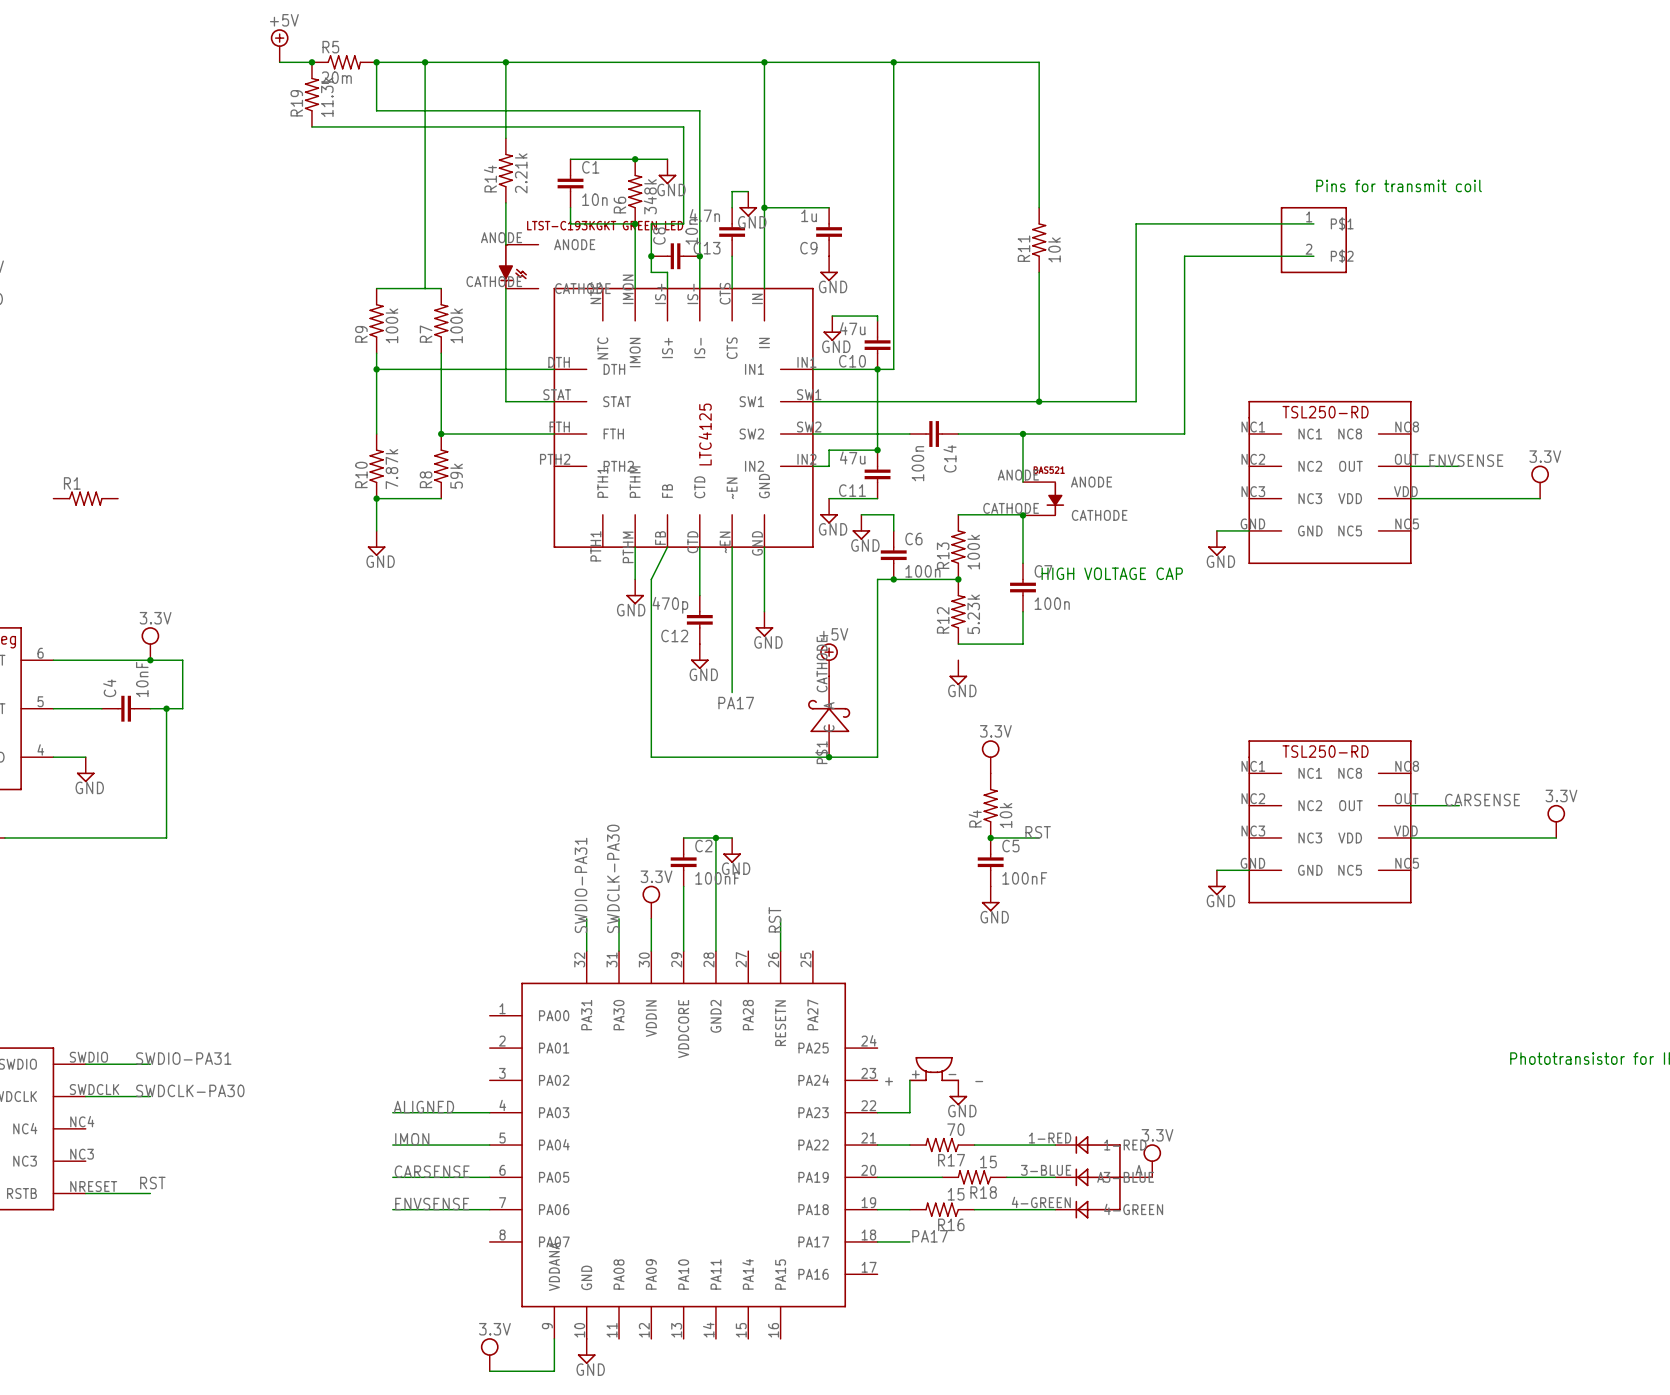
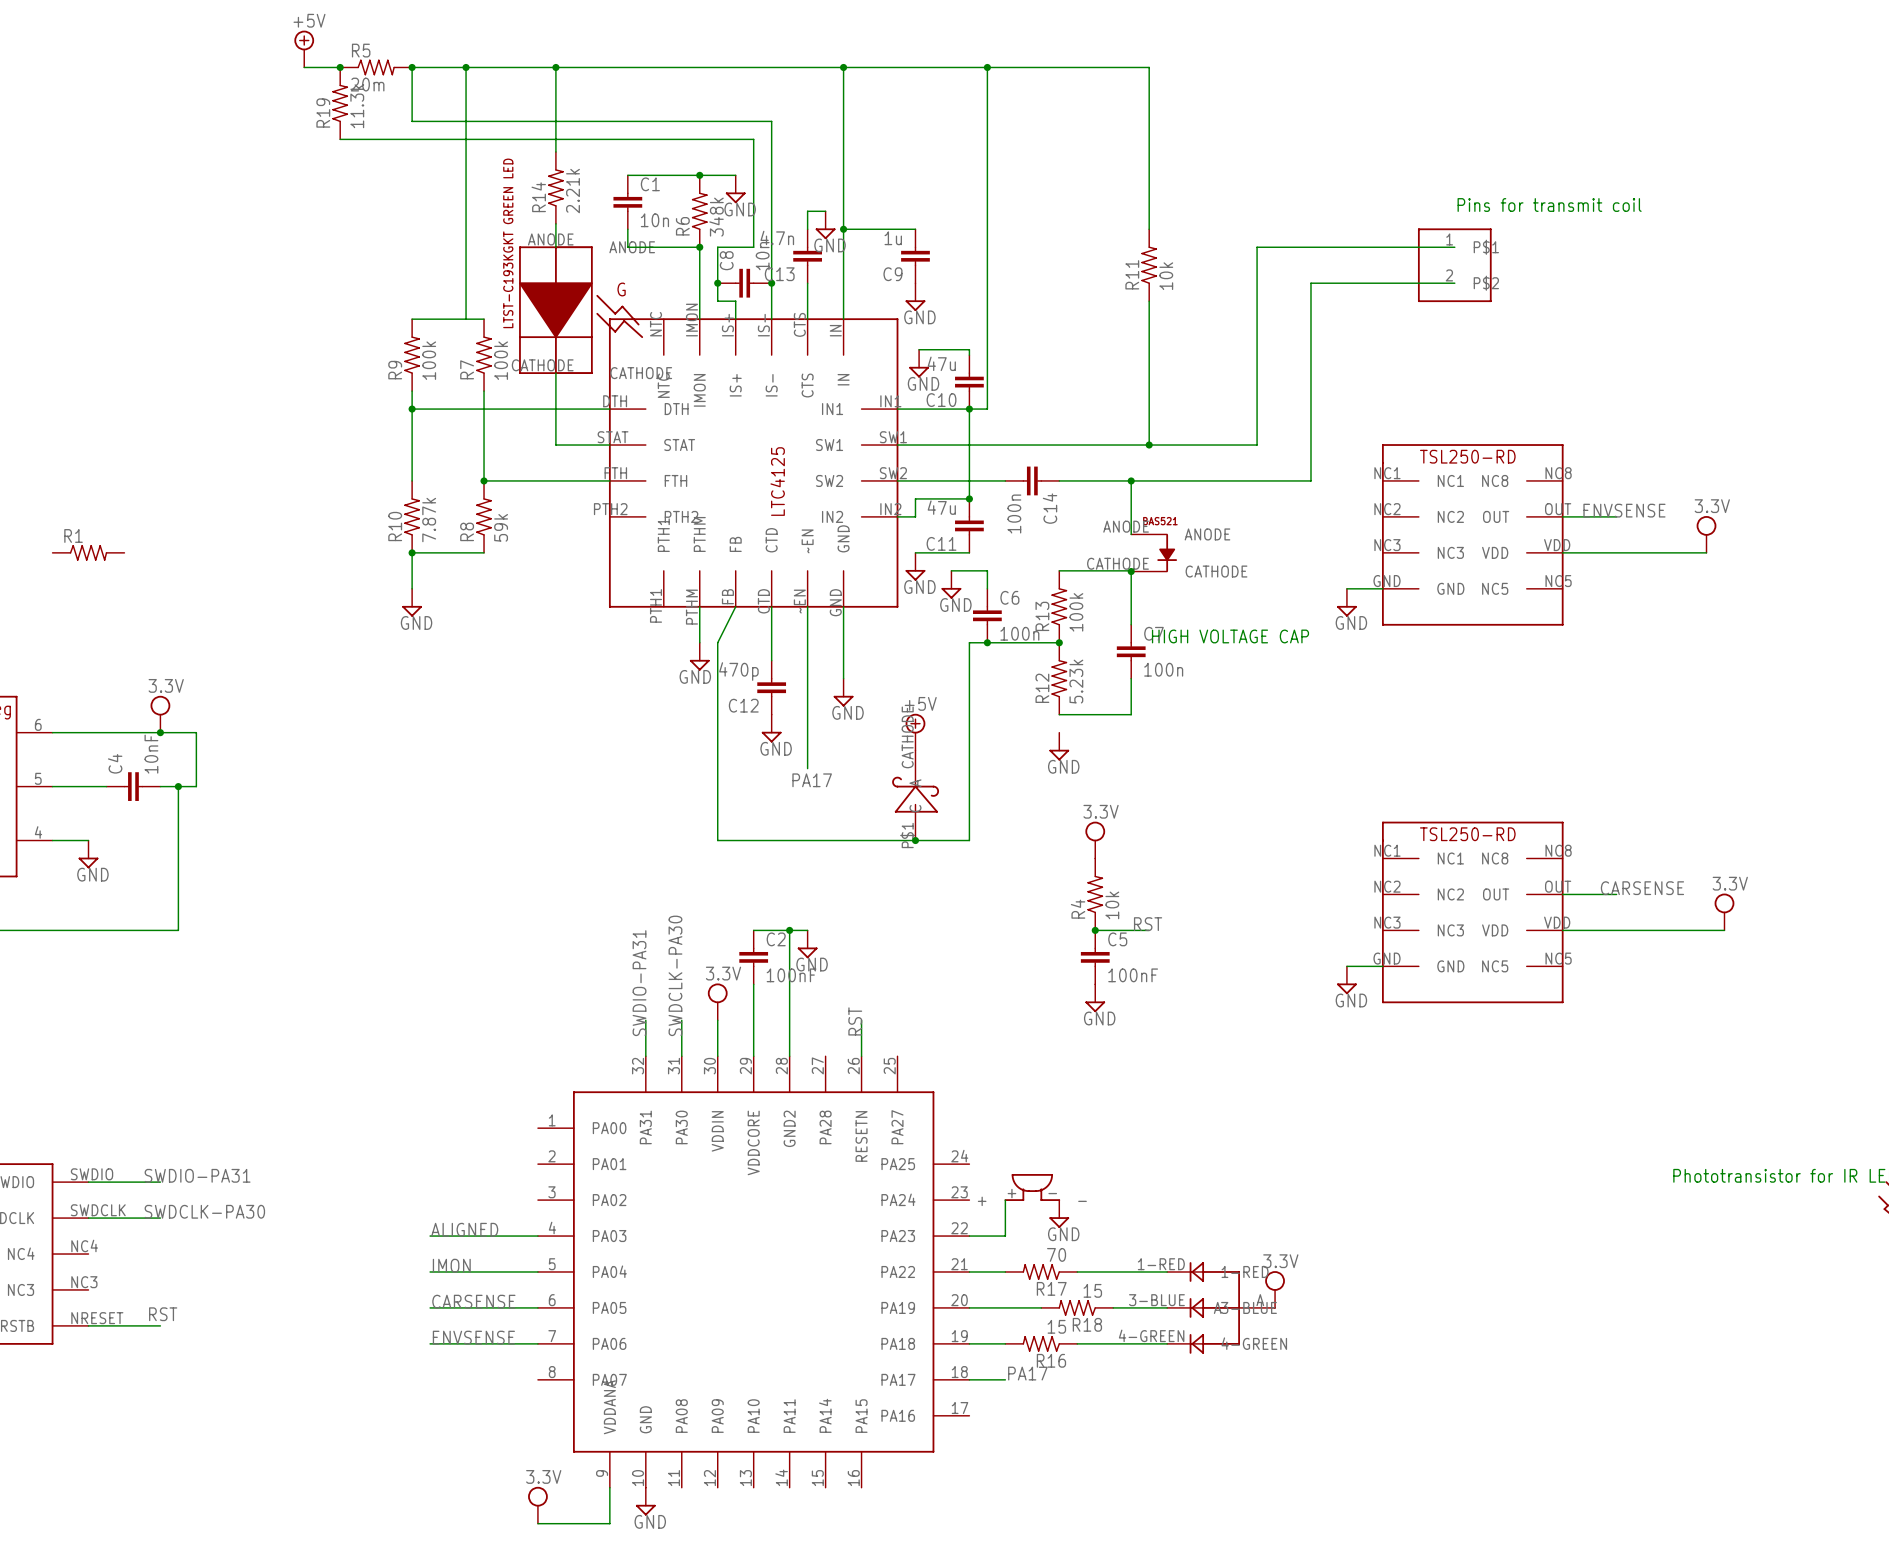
part: (518, 266) -> none
part: none -> (581, 310)

